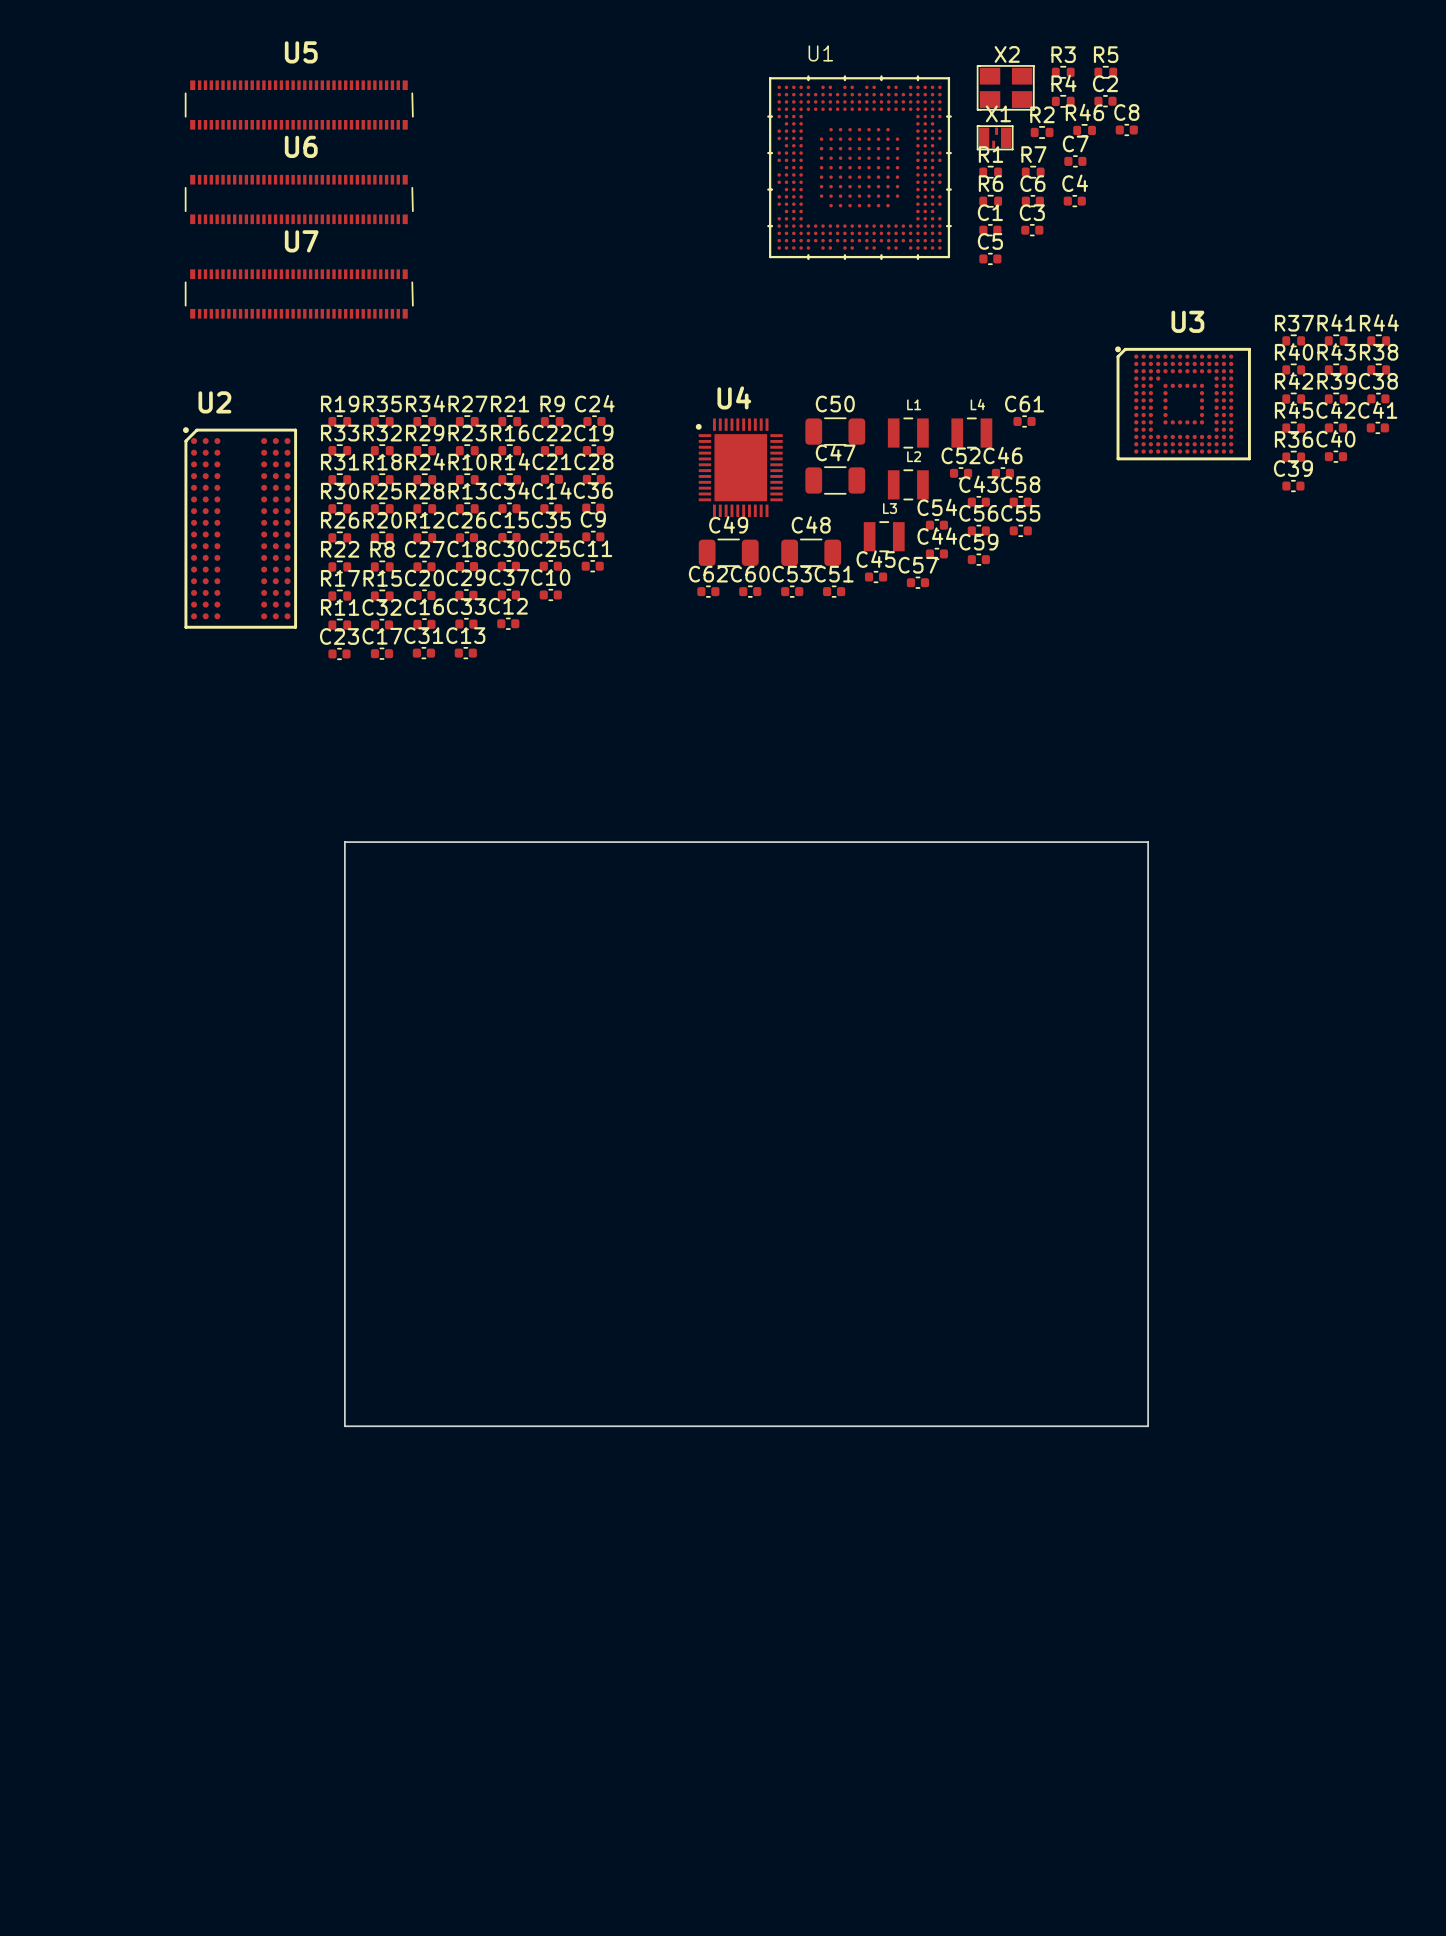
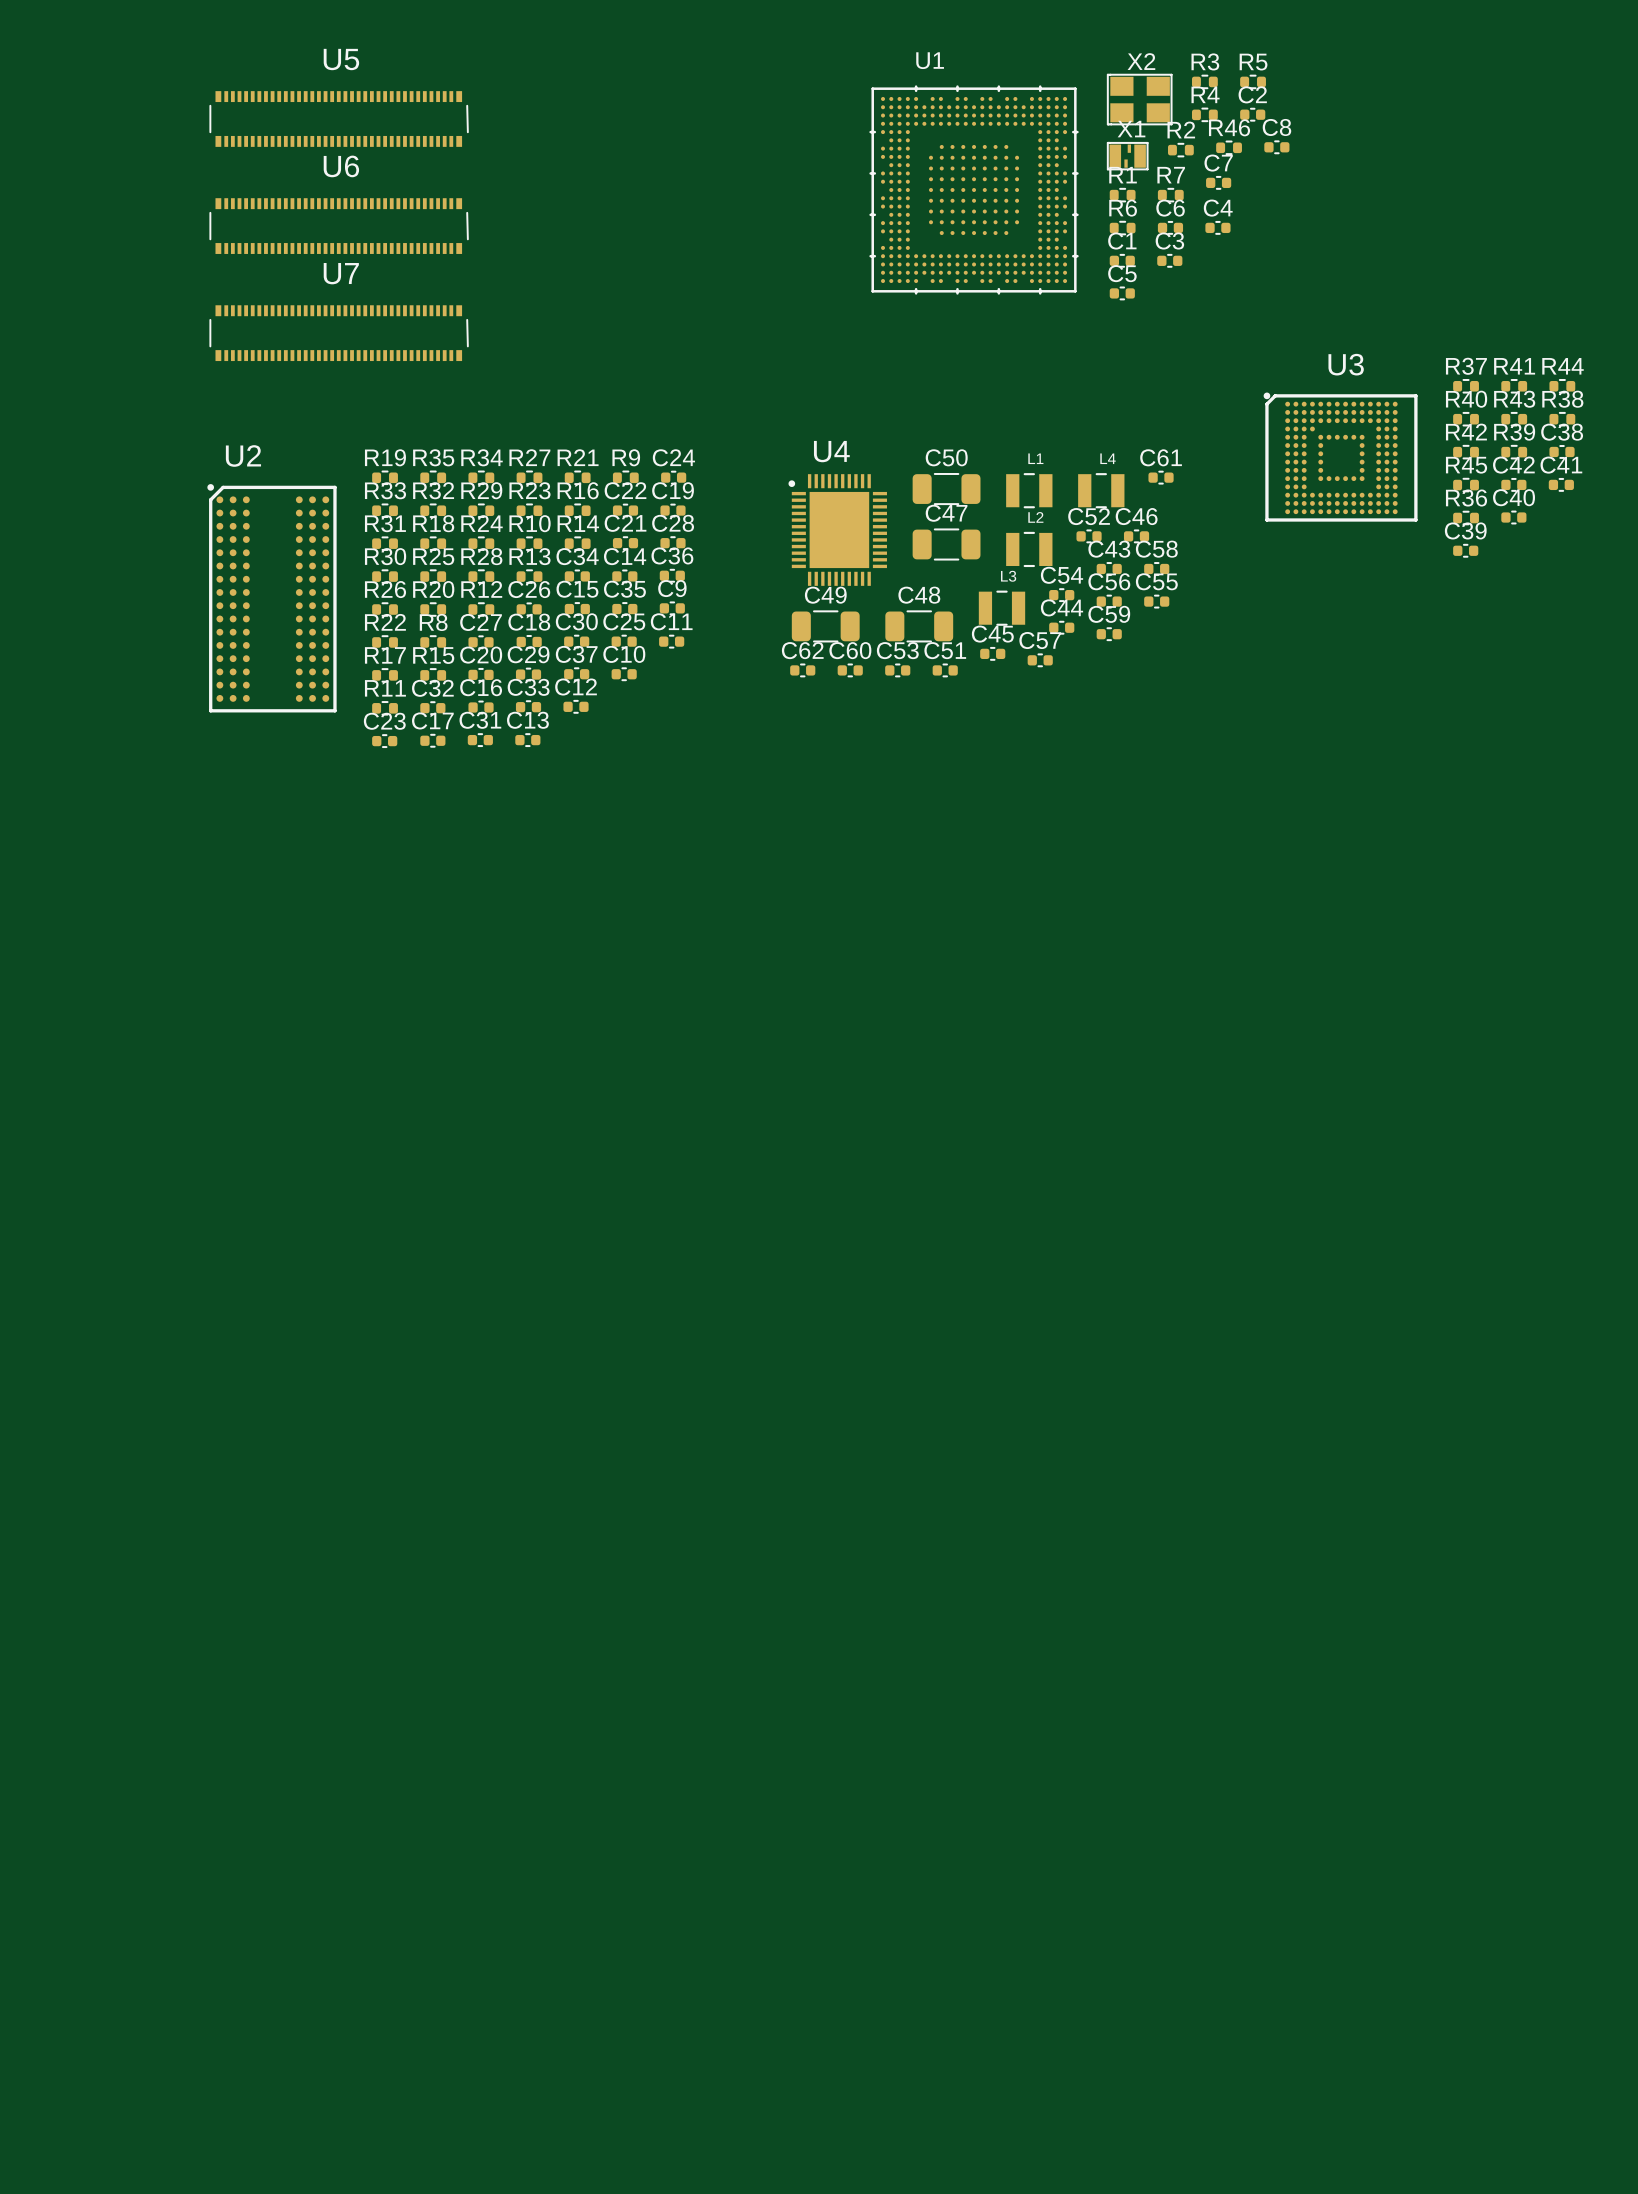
board edge: (344, 842) (344, 1426) (1148, 1426) (1148, 842) (344, 842) -> none

